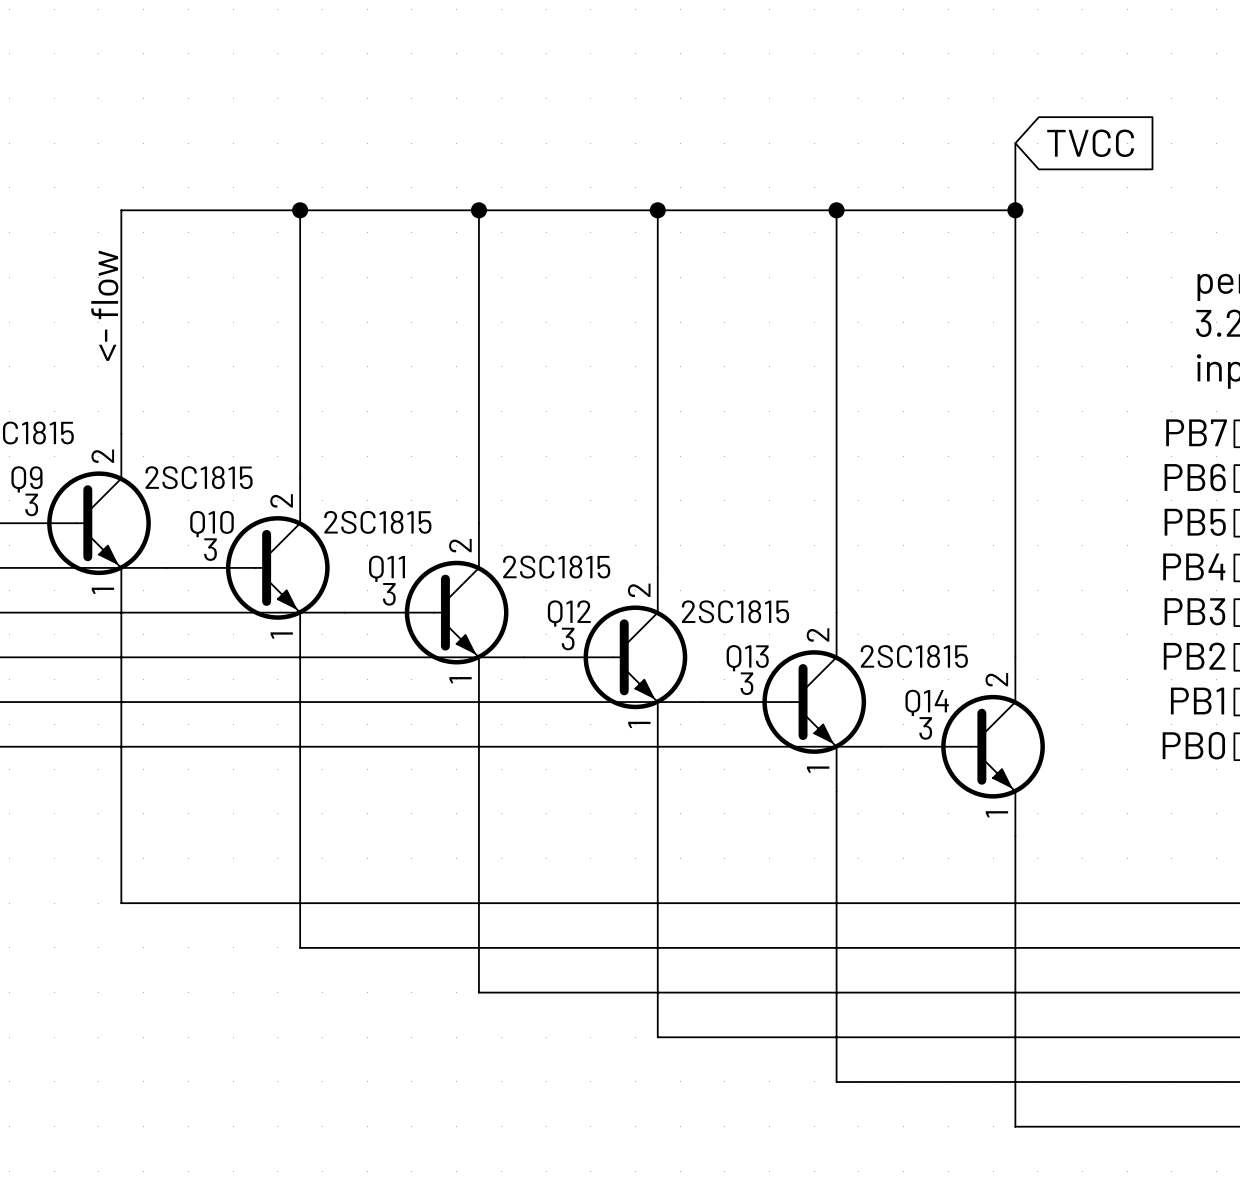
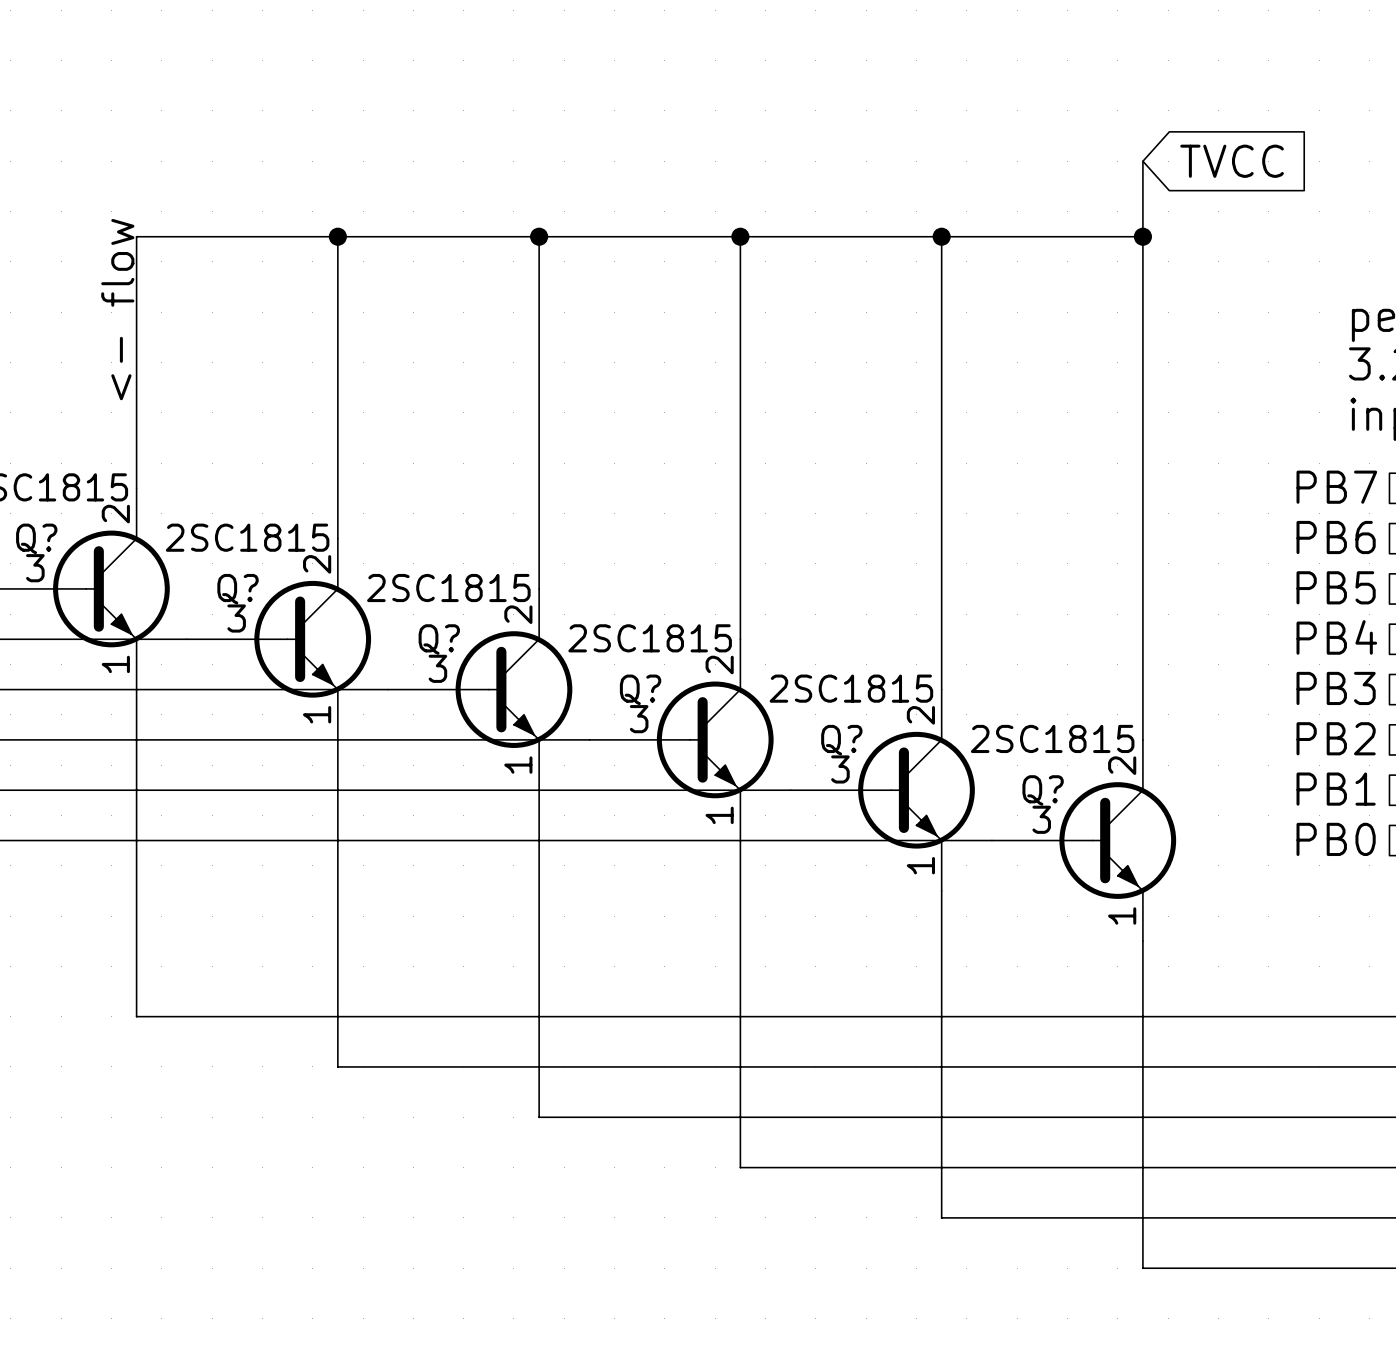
Q9 name: Q9 (26, 479) -> Q? (36, 538)
Q10 name: Q10 (211, 524) -> Q? (238, 589)
Q11 name: Q11 (387, 568) -> Q? (439, 639)
Q12 name: Q12 (569, 613) -> Q? (640, 689)
Q13 name: Q13 (747, 658) -> Q? (841, 740)
Q14 name: Q14 (927, 702) -> Q? (1043, 790)

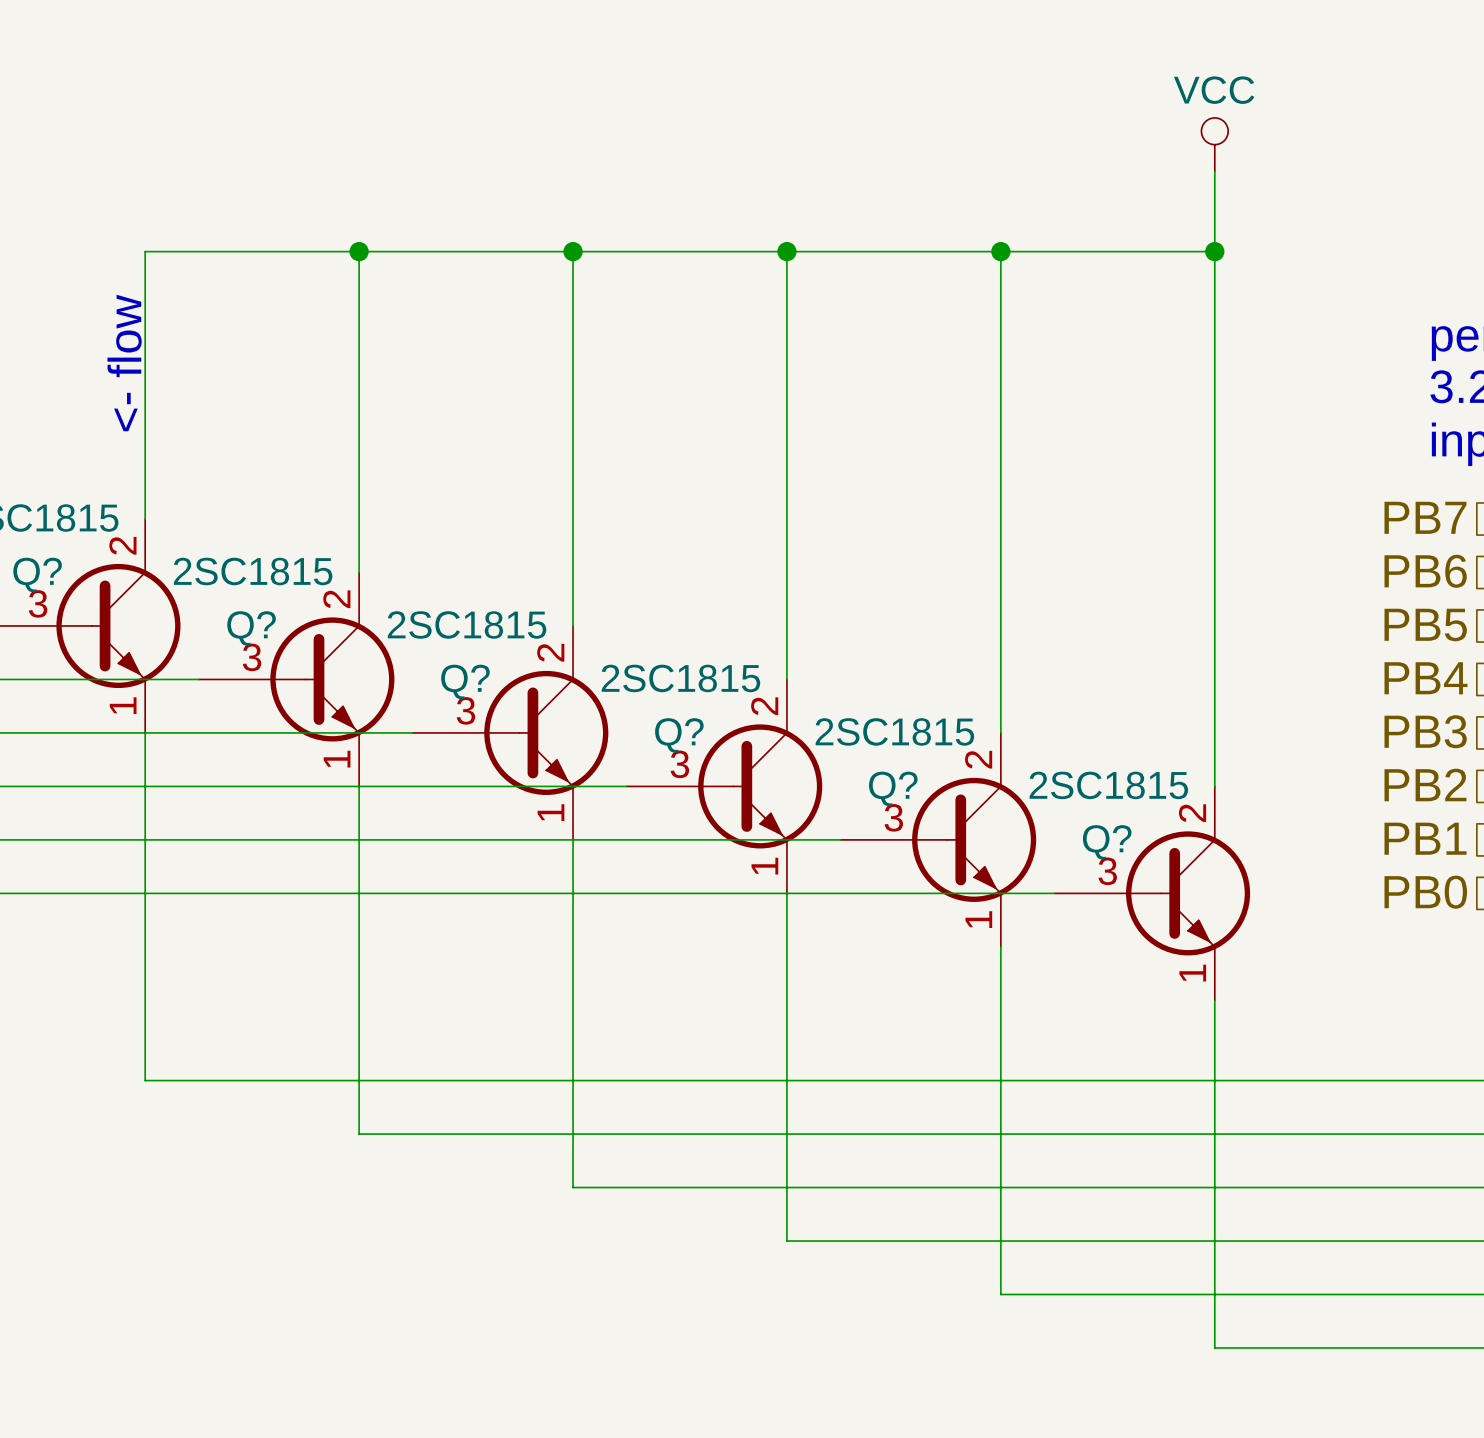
power symbol: none -> VCC (1214, 144)
global label: TVCC (1232, 161) -> none

